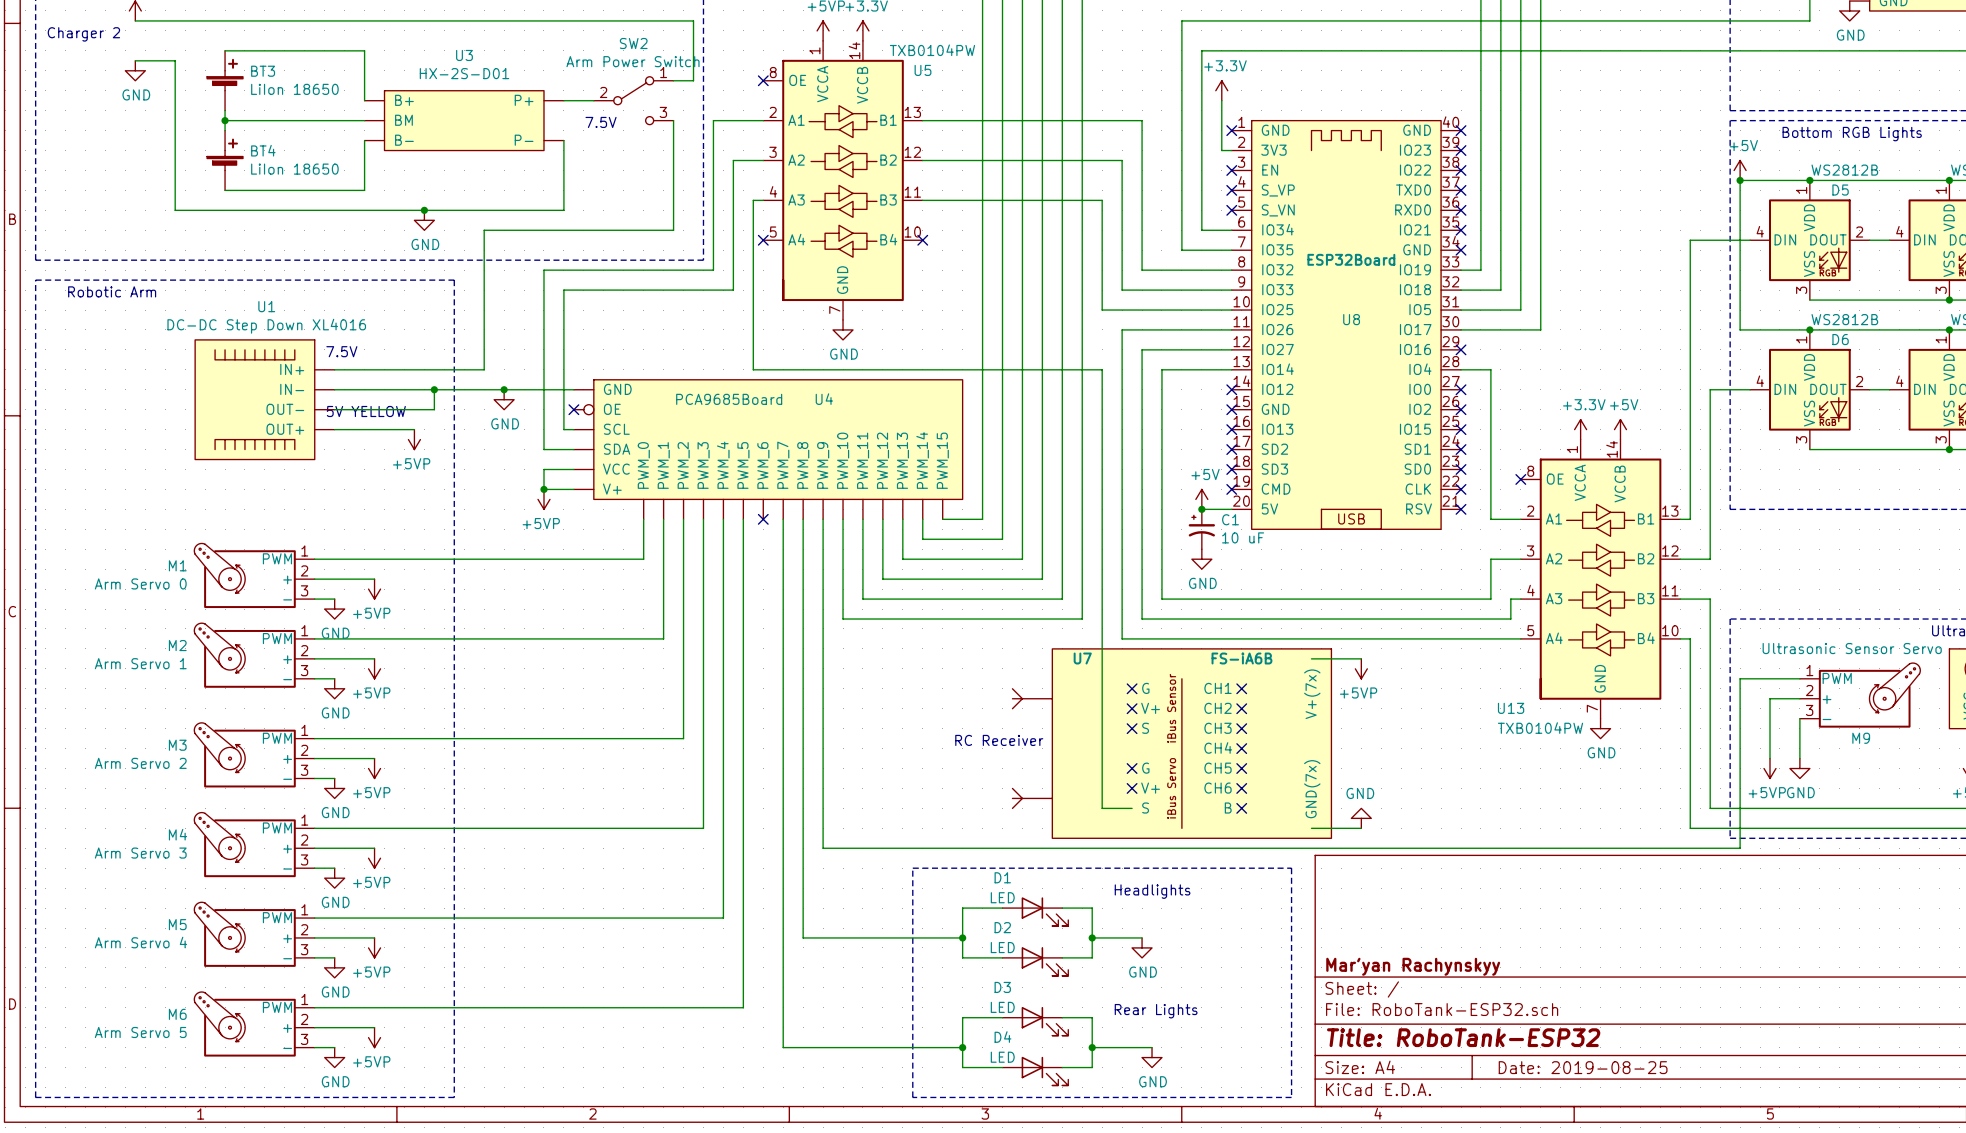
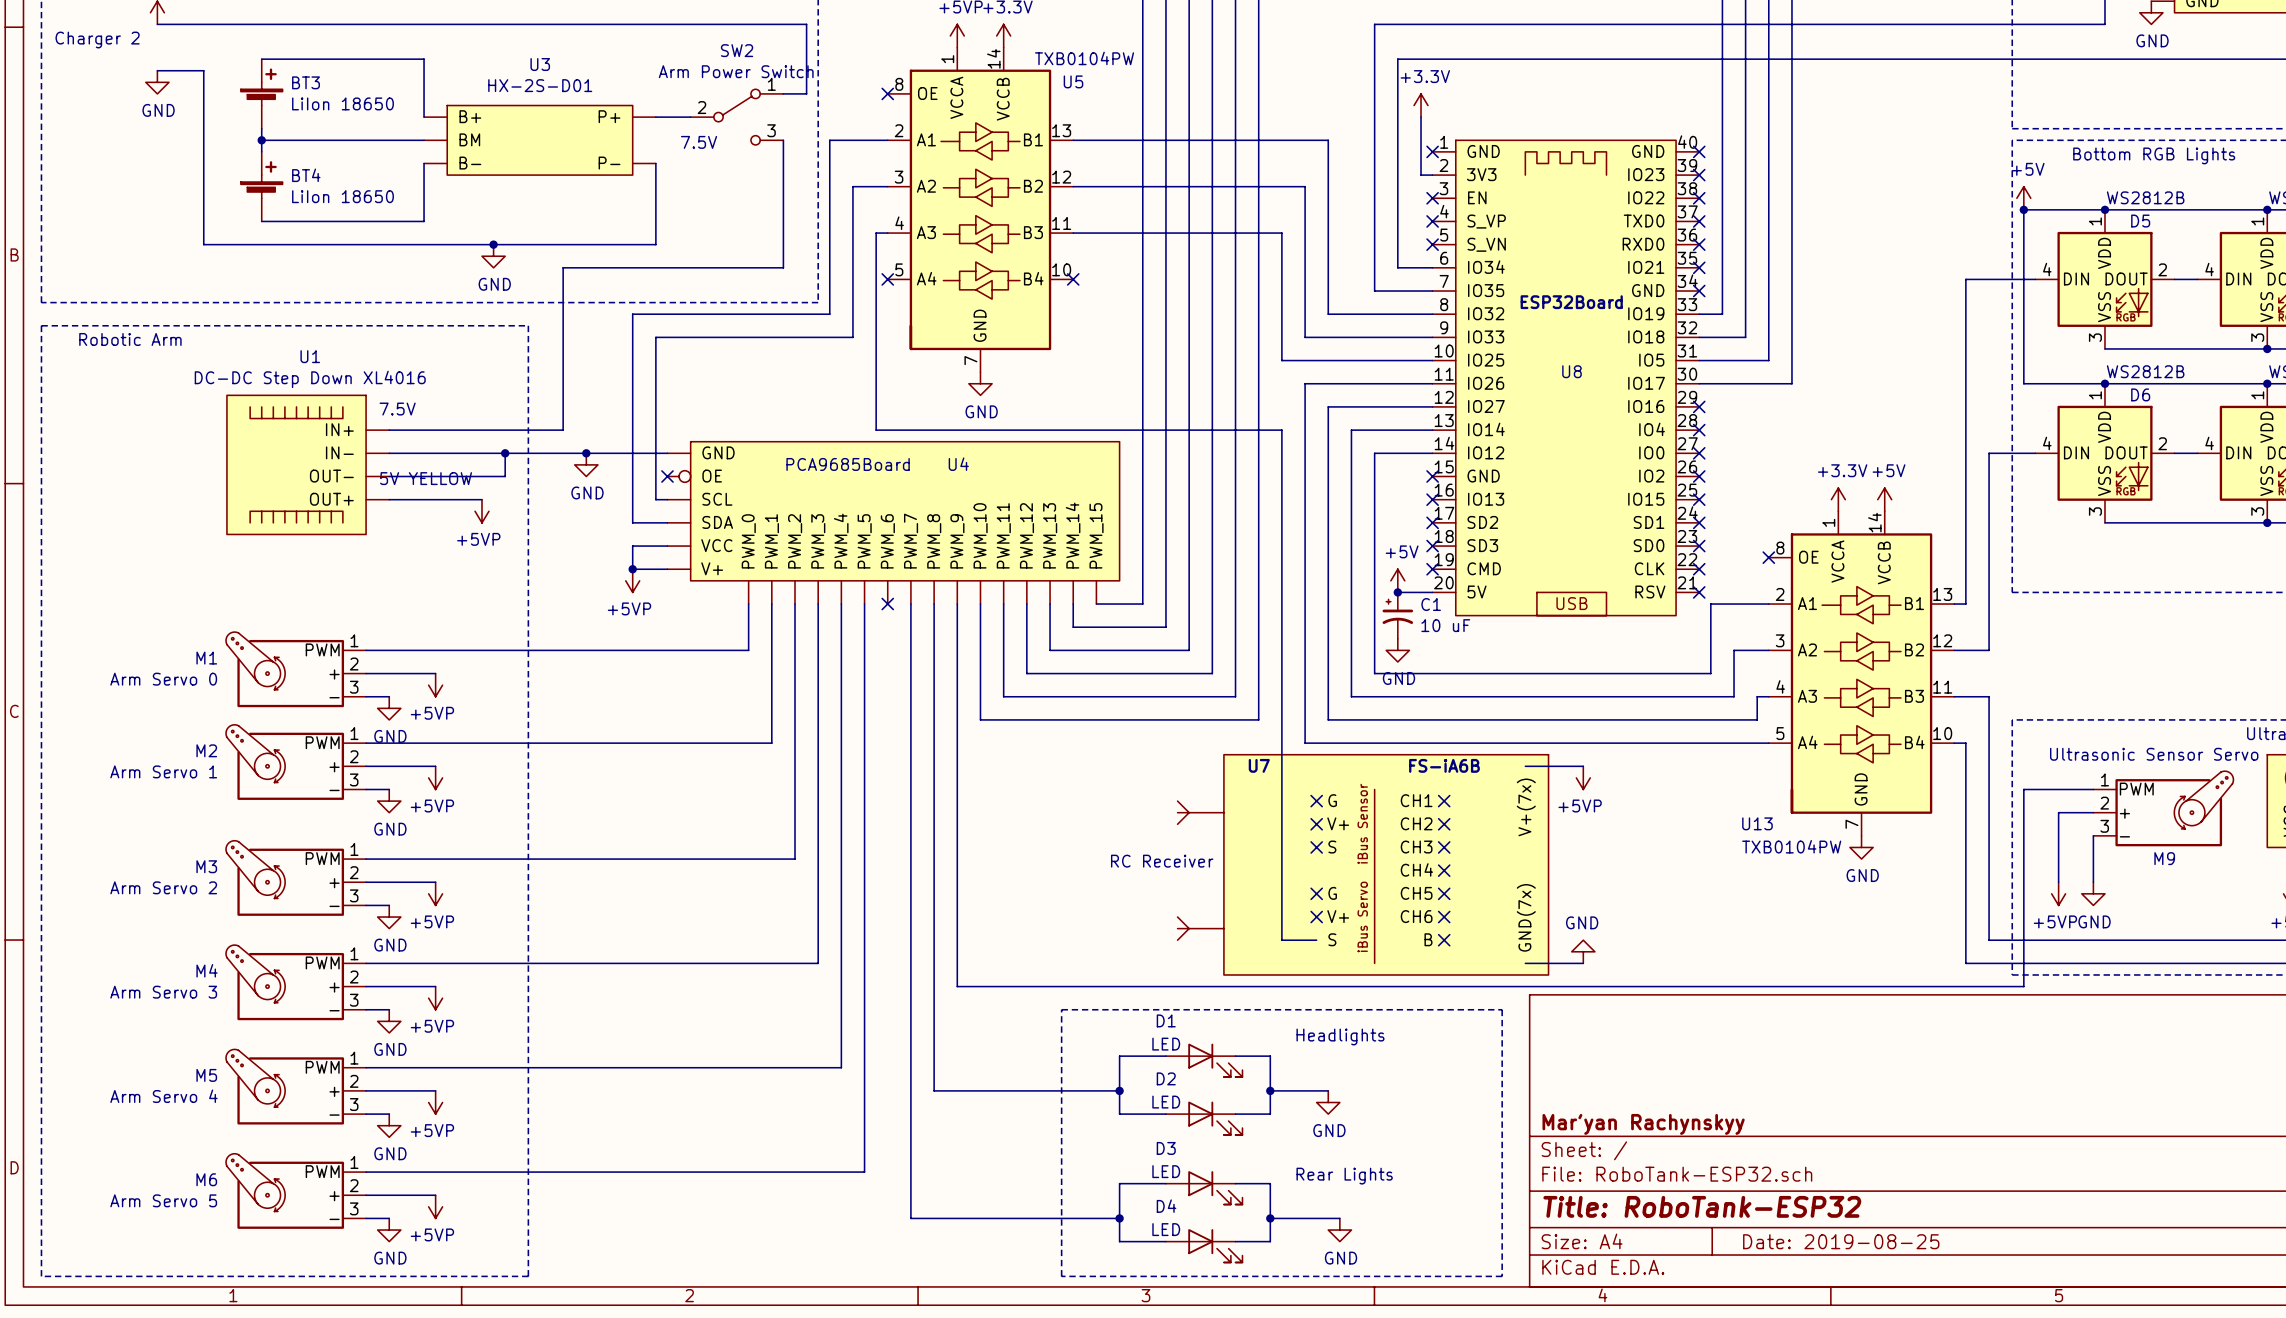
wire: (1461, 369) (1490, 369) (1490, 519) -> (1432, 453) (1374, 453) (1374, 673) (1710, 673) (1710, 604) (1734, 604)
no-connect mark: none -> (1699, 430)
no-connect mark: (1231, 389) -> none

